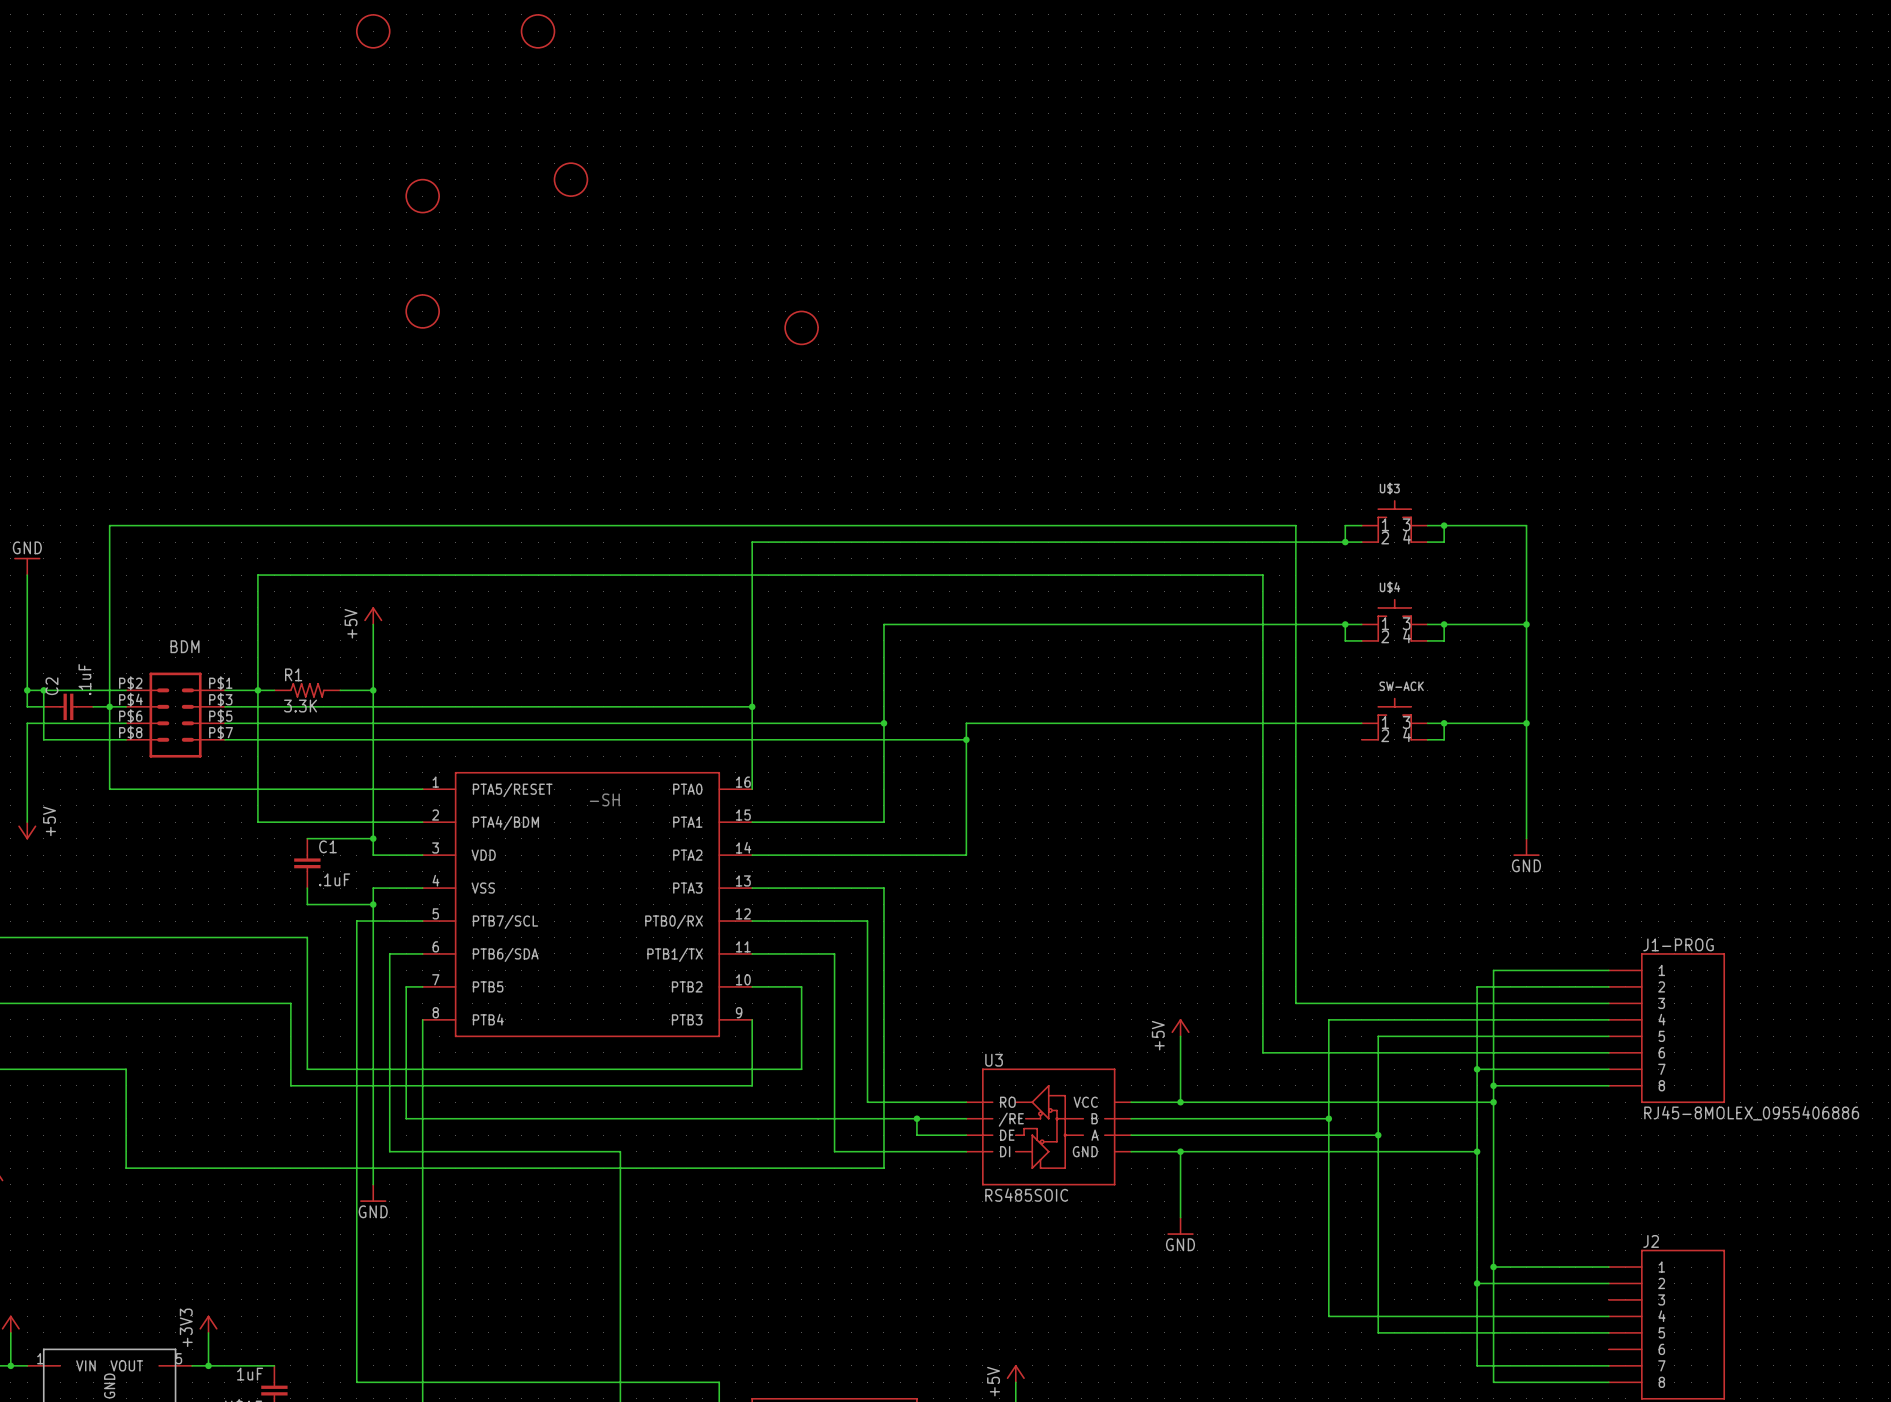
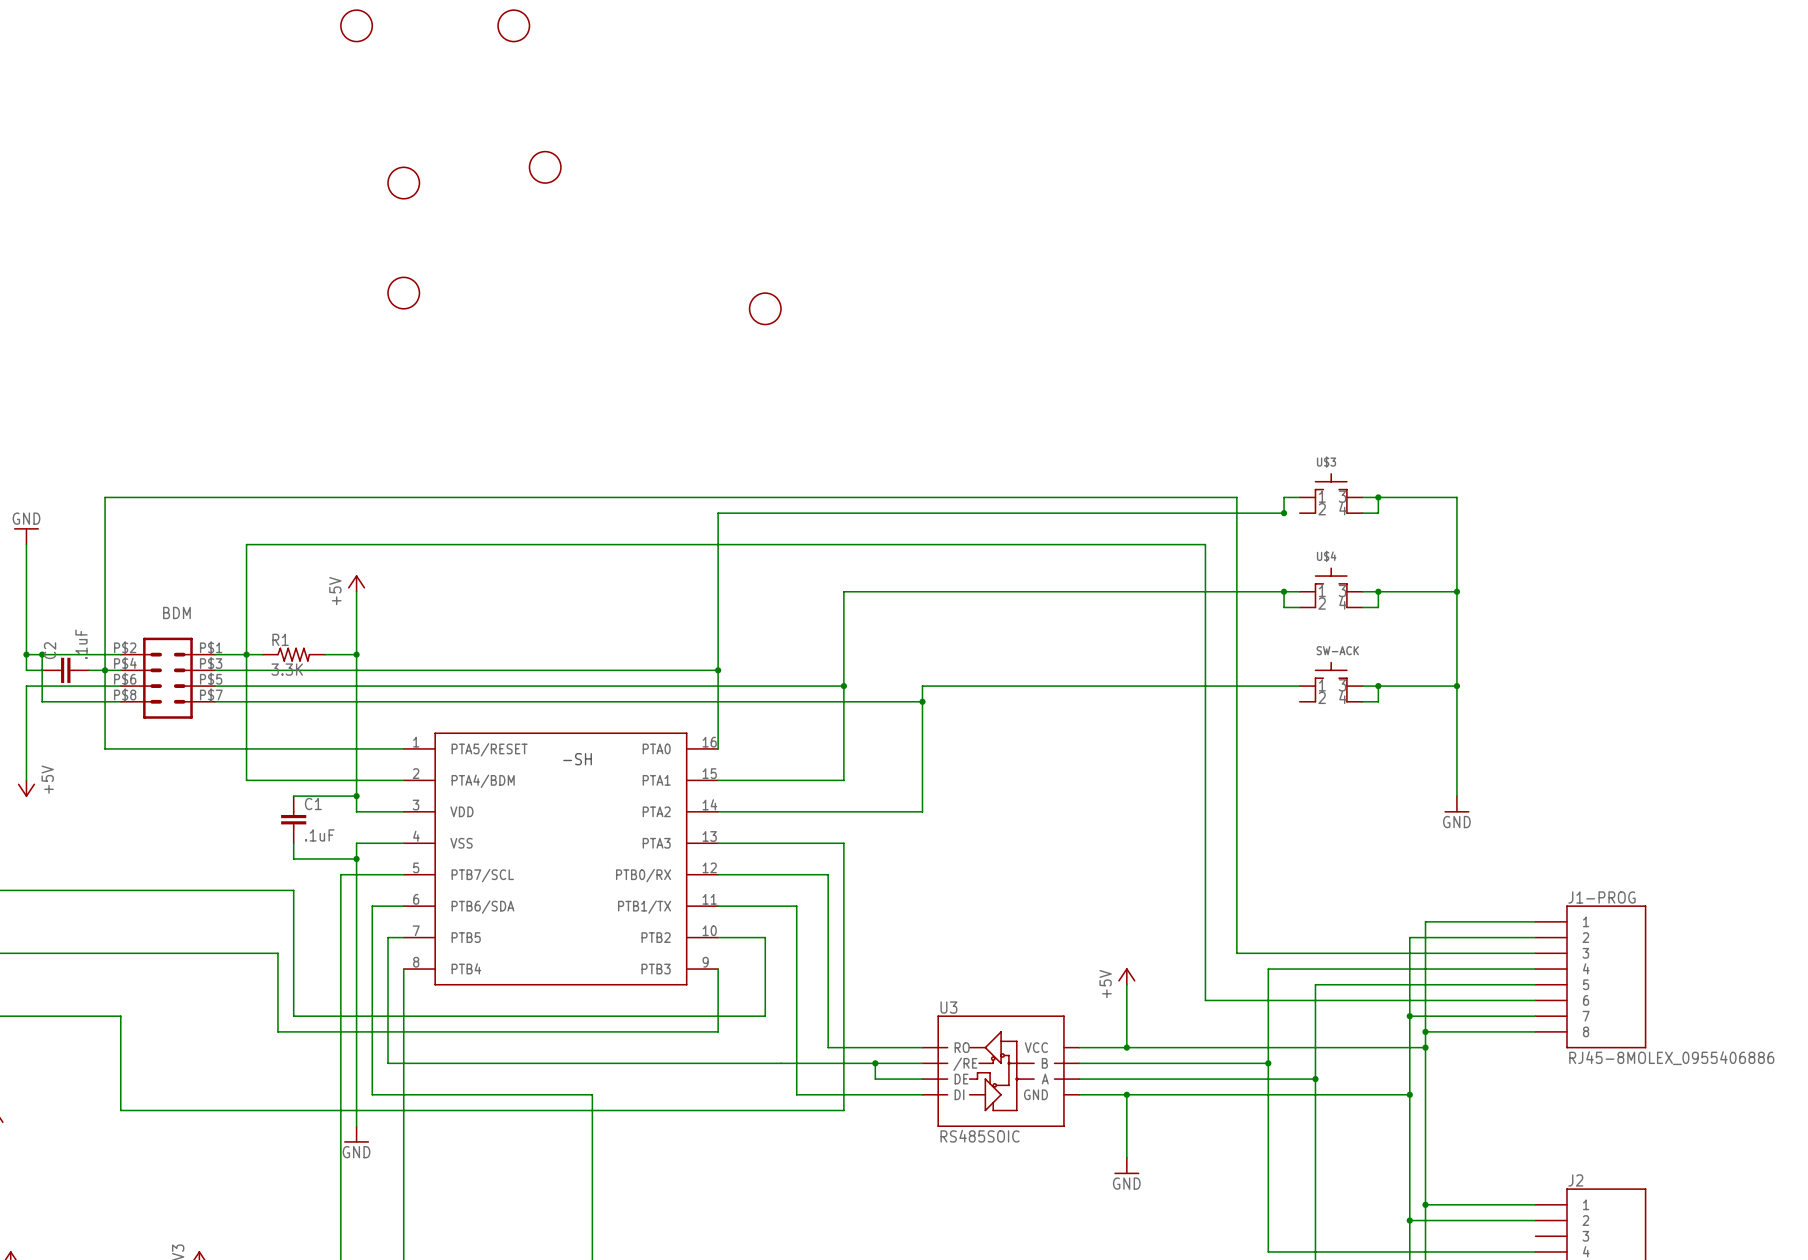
wire: (1345, 542) (1361, 542) -> none

